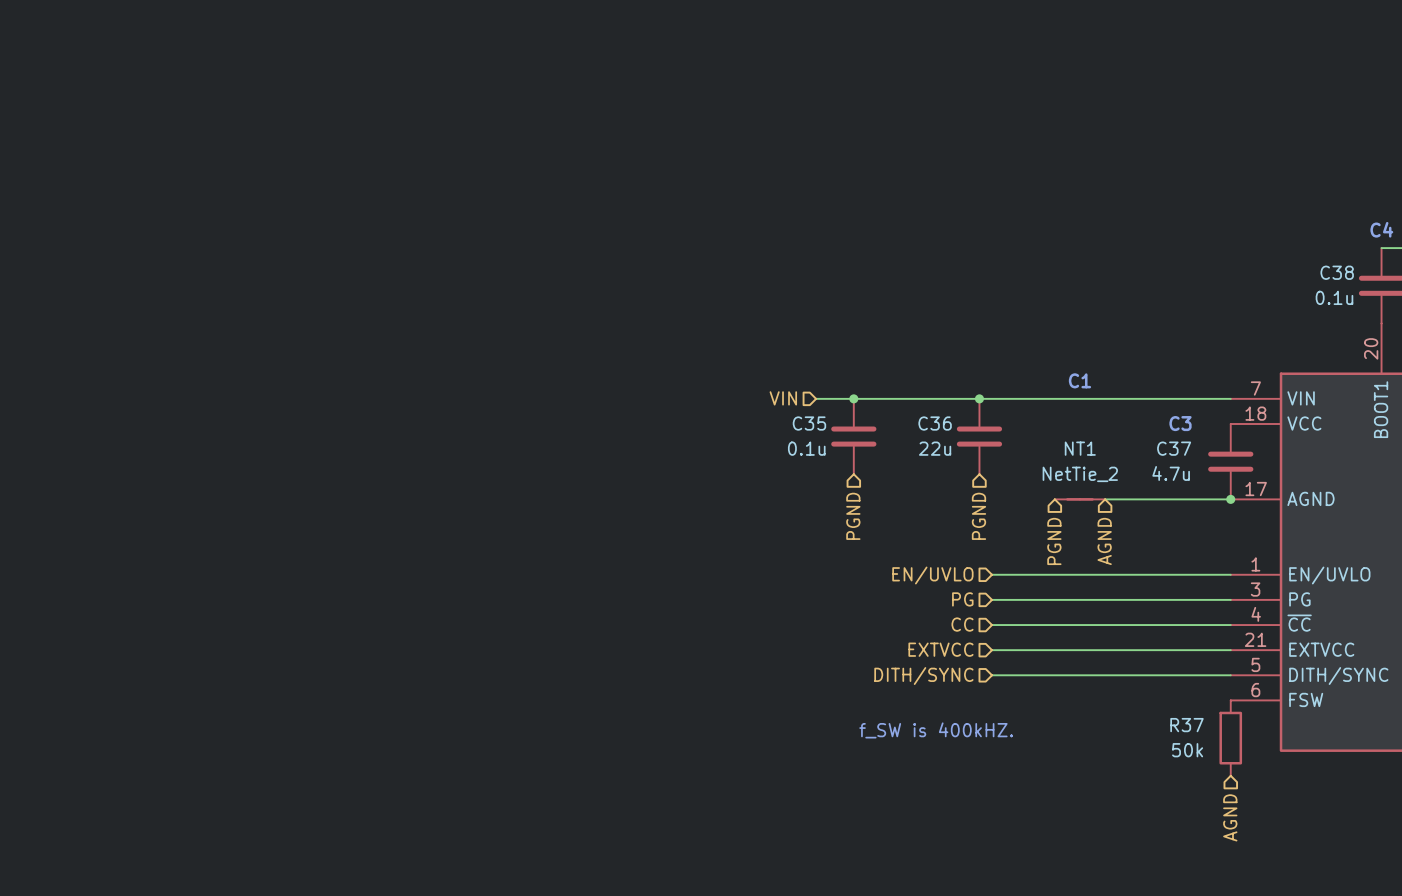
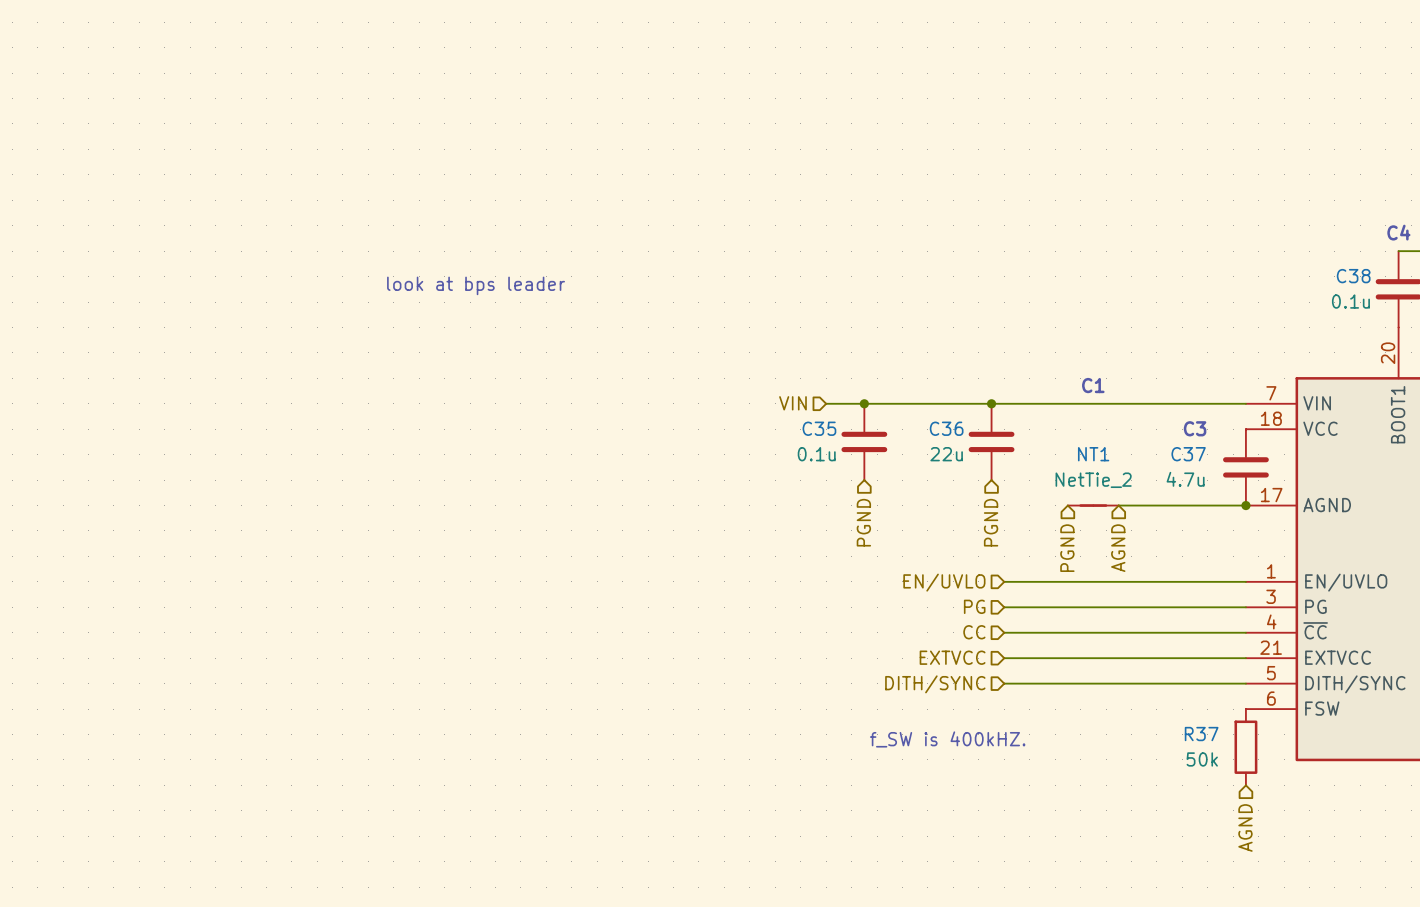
text: none -> look at bps leader (476, 285)

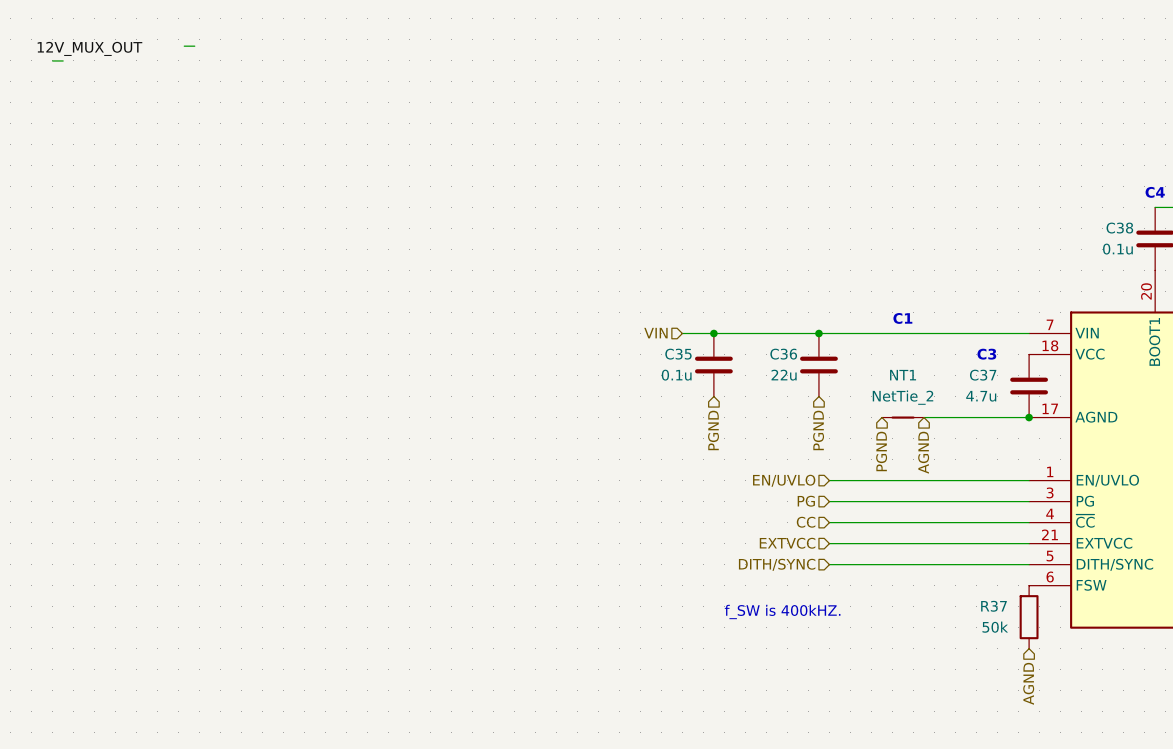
wire: none -> (184, 46) (194, 46)
label: none -> 12V_MUX_OUT (89, 48)
wire: none -> (52, 60) (63, 60)
text: look at bps leader (476, 285) -> none

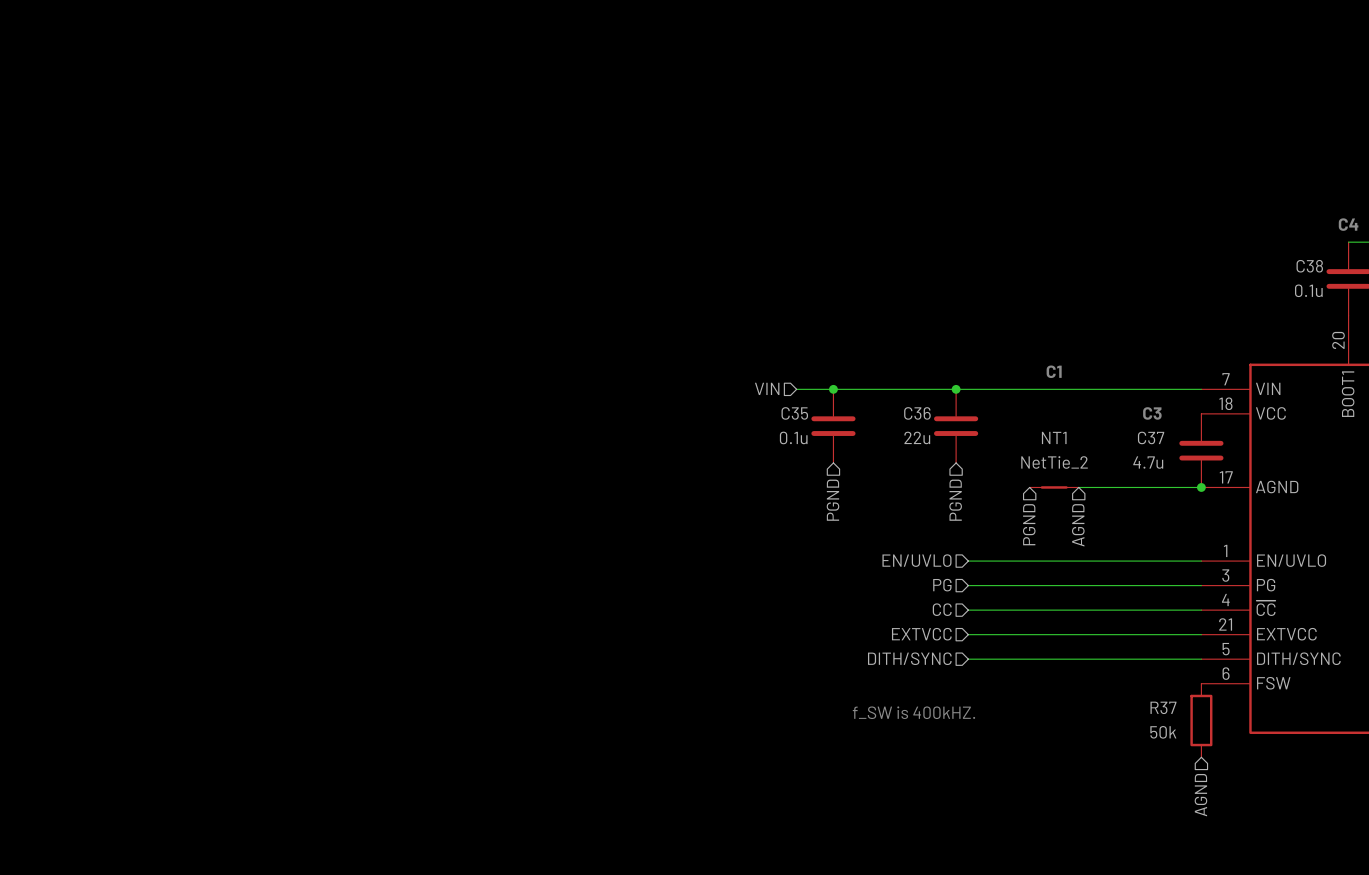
wire: (184, 46) (194, 46) -> none
label: 12V_MUX_OUT (89, 48) -> none
wire: (52, 60) (63, 60) -> none

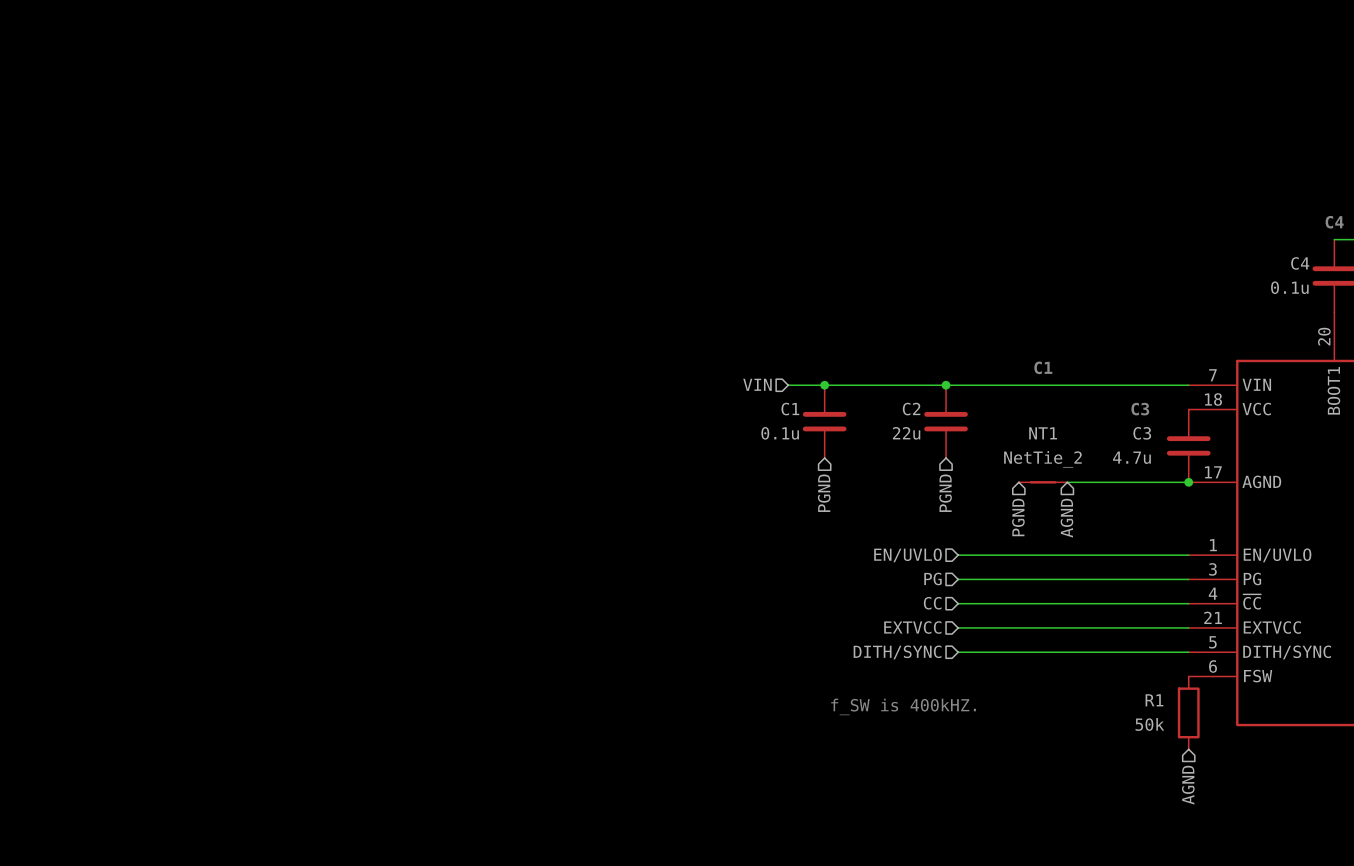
C38 name: C38 (1309, 266) -> C4 (1300, 263)
C35 name: C35 (794, 413) -> C1 (790, 409)
C36 name: C36 (917, 413) -> C2 (911, 409)
C37 name: C37 (1151, 437) -> C3 (1142, 433)
R37 name: R37 (1163, 707) -> R1 (1154, 700)

